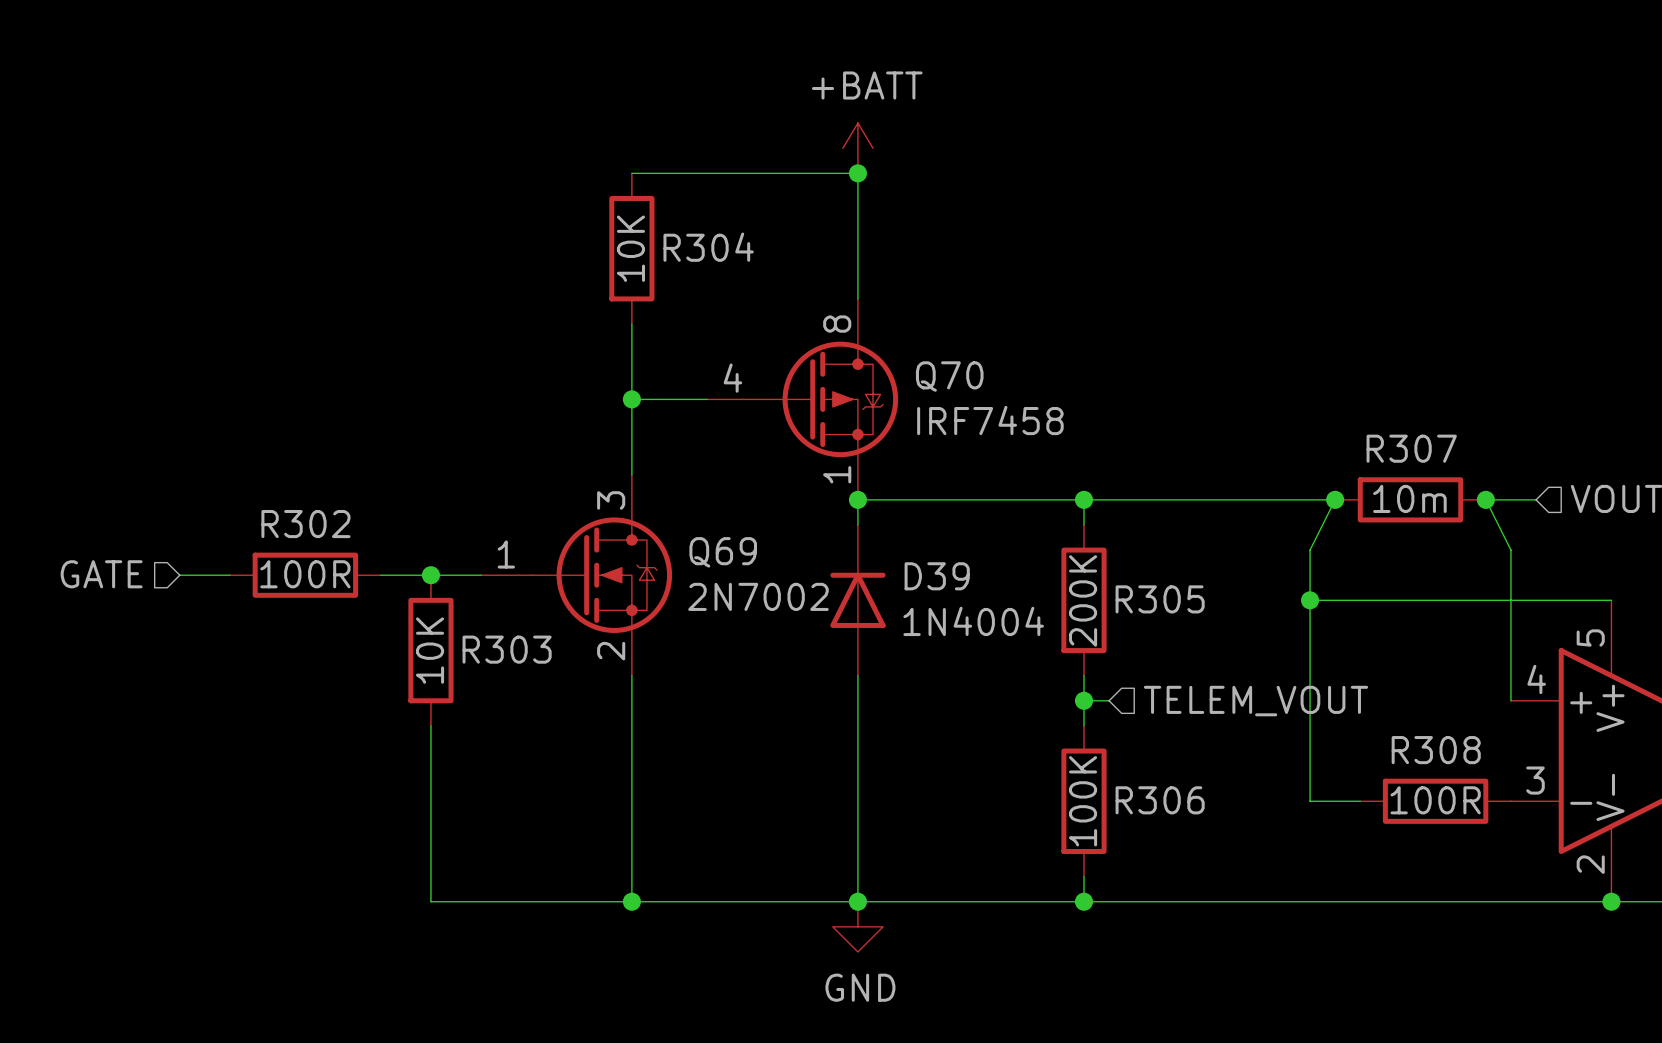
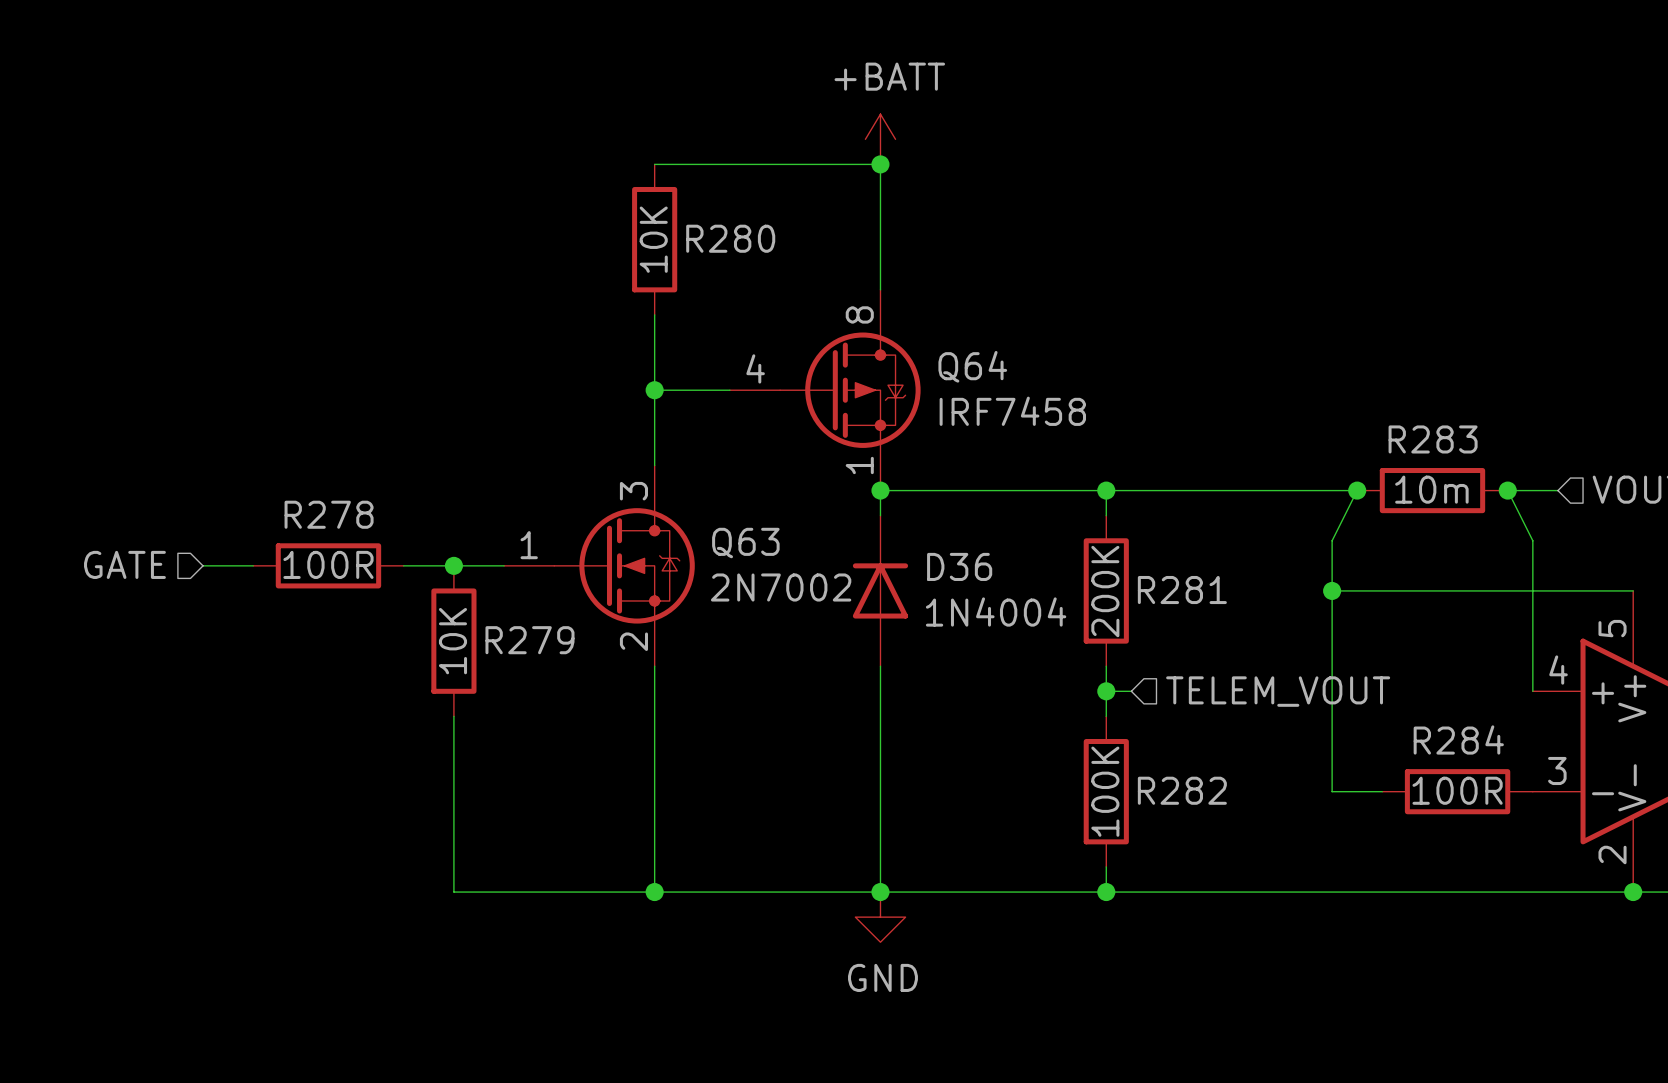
R304 name: R304 (708, 247) -> R280 (730, 238)
Q70 name: Q70 (949, 376) -> Q64 (972, 366)
R307 name: R307 (1411, 448) -> R283 (1433, 439)
R302 name: R302 (305, 524) -> R278 (329, 514)
Q69 name: Q69 (723, 552) -> Q63 (745, 543)
D39 name: D39 (937, 576) -> D36 (959, 566)
R305 name: R305 (1160, 599) -> R281 (1182, 590)
R303 name: R303 (507, 649) -> R279 (529, 640)
R308 name: R308 (1436, 750) -> R284 (1458, 739)
R306 name: R306 (1160, 800) -> R282 (1182, 790)

